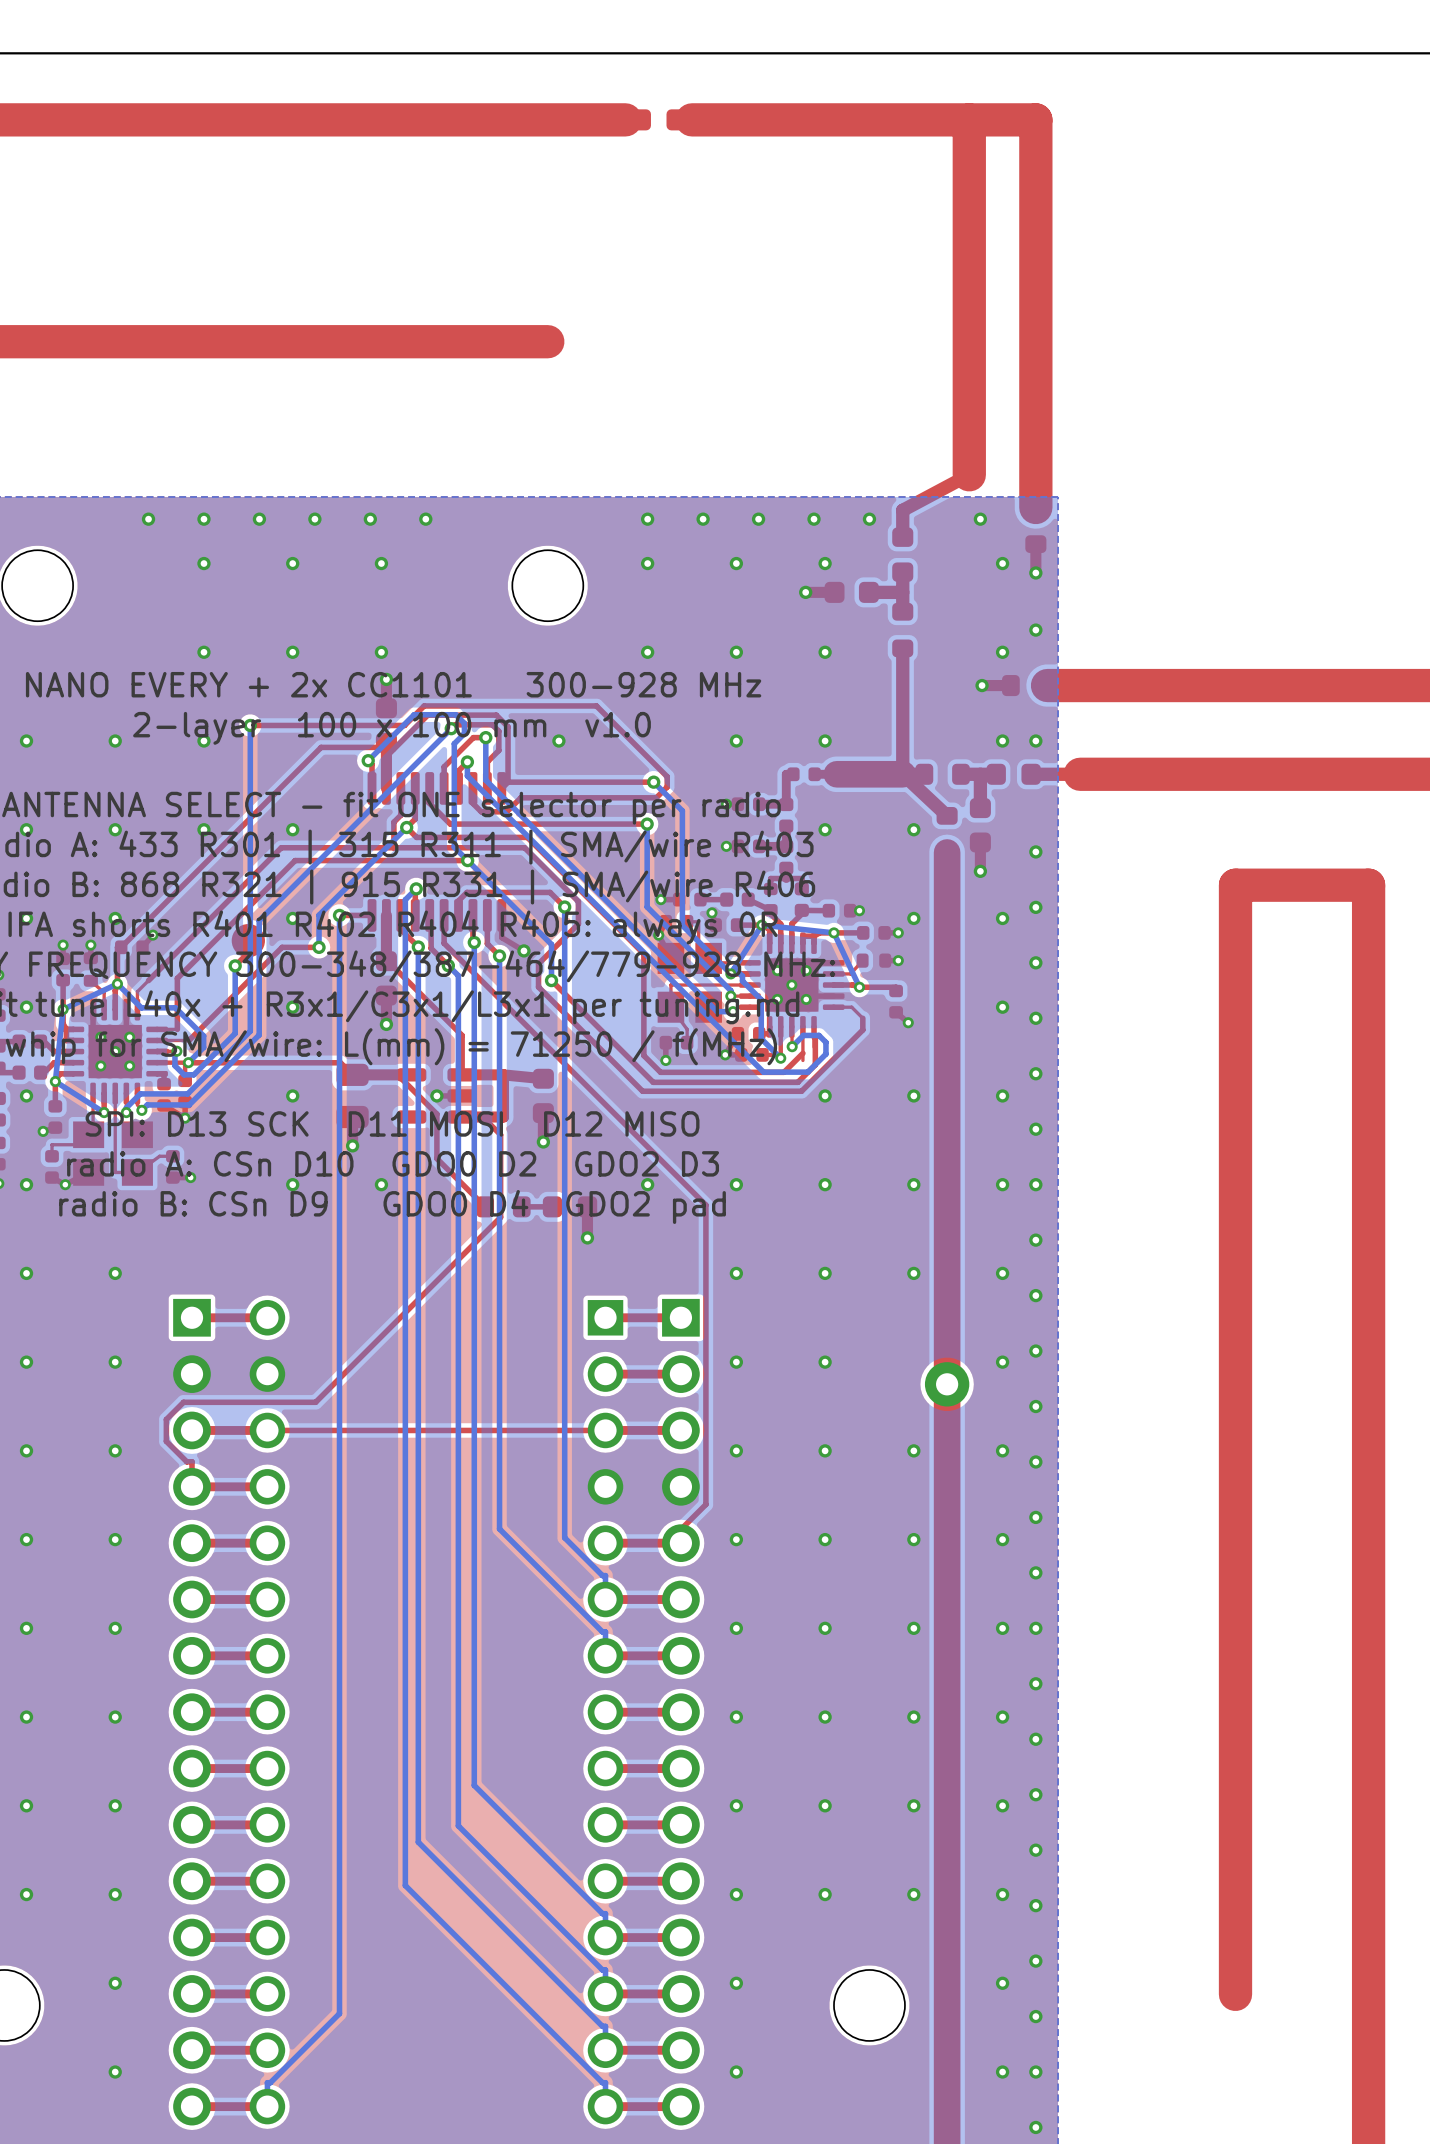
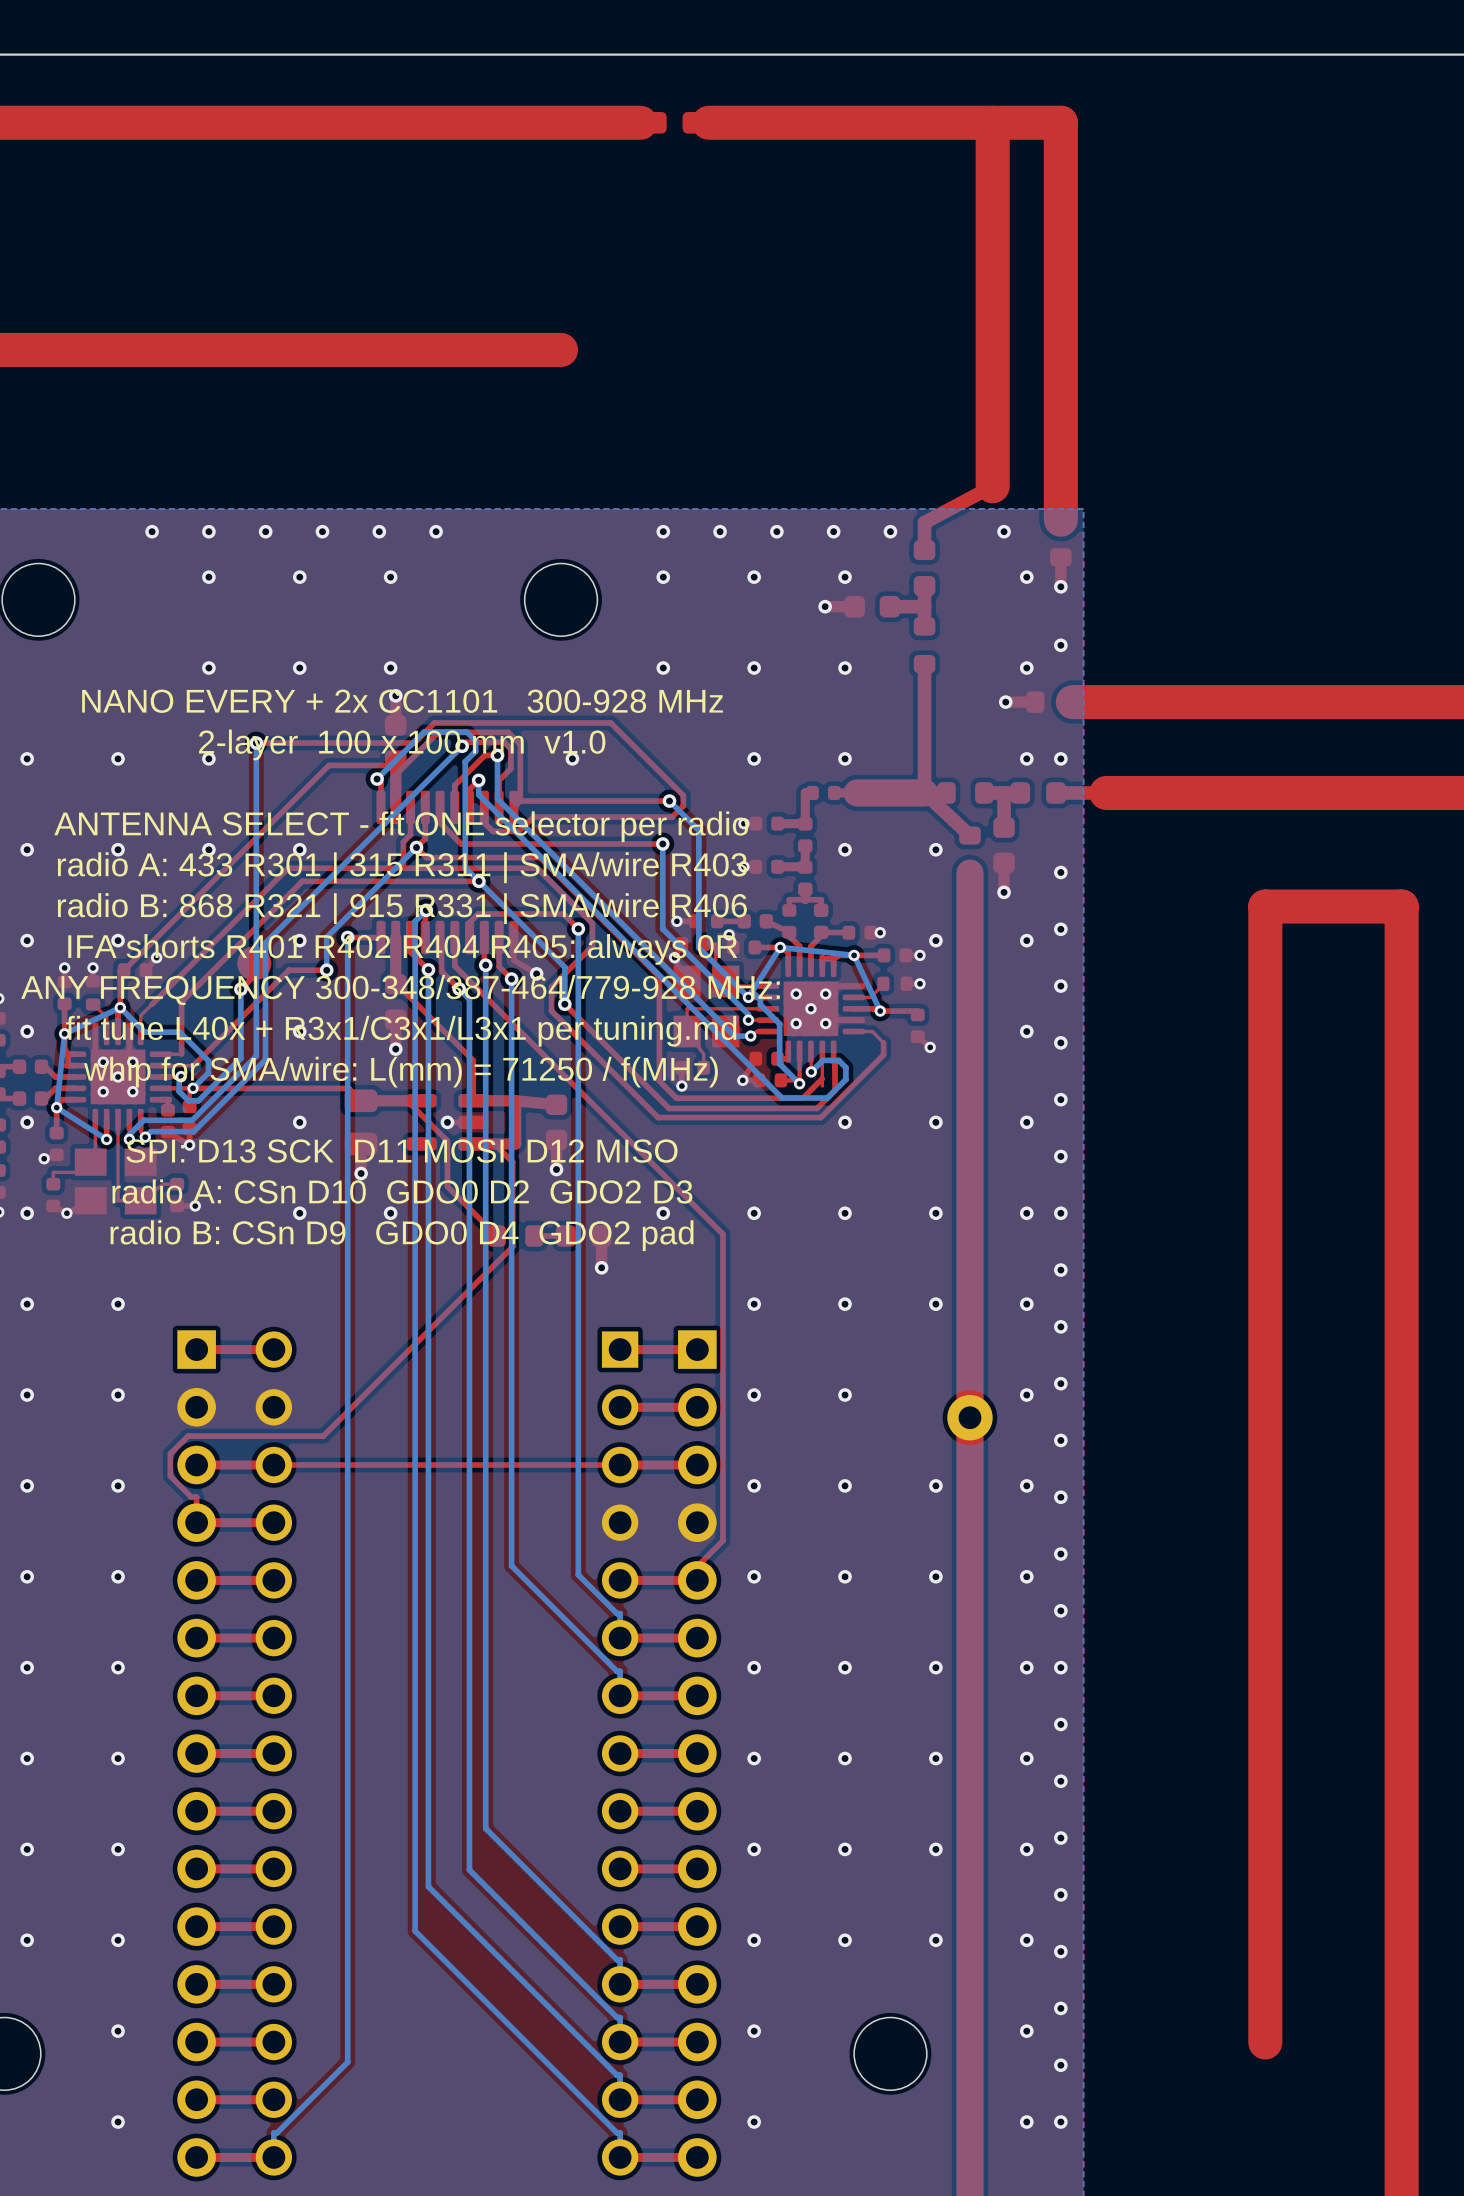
via: (1035, 2127) -> none

